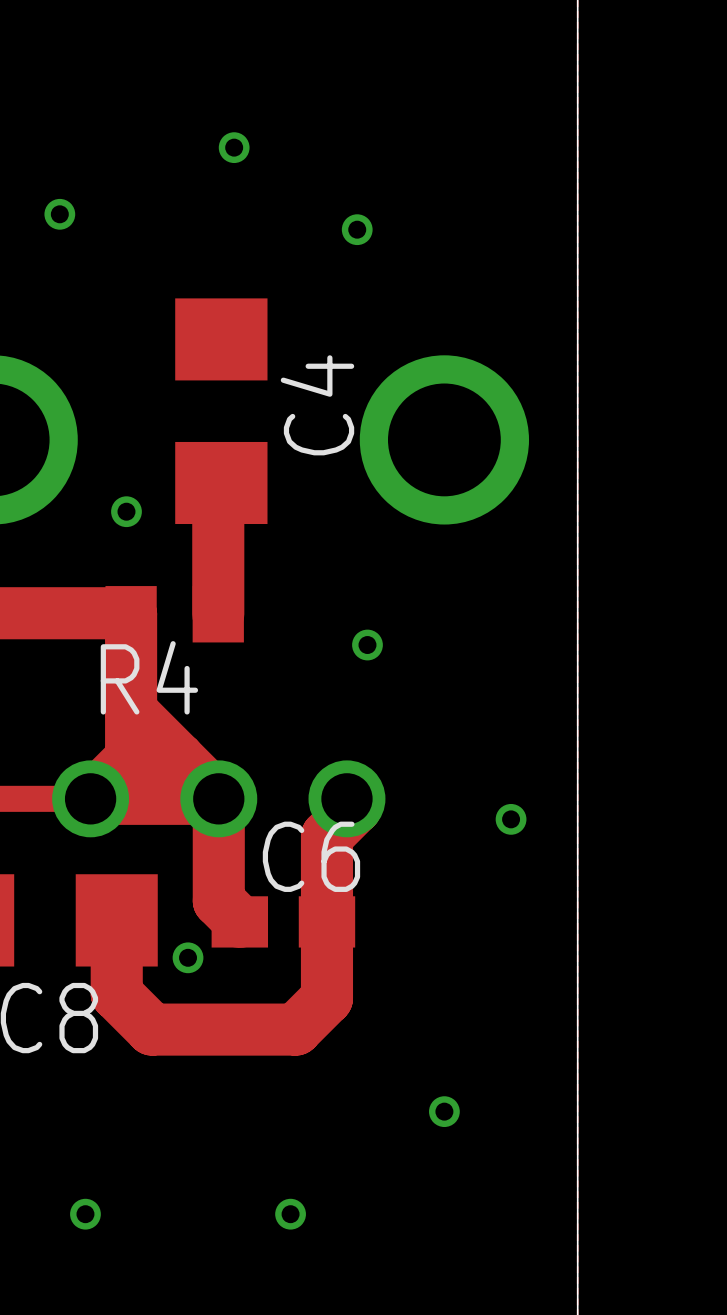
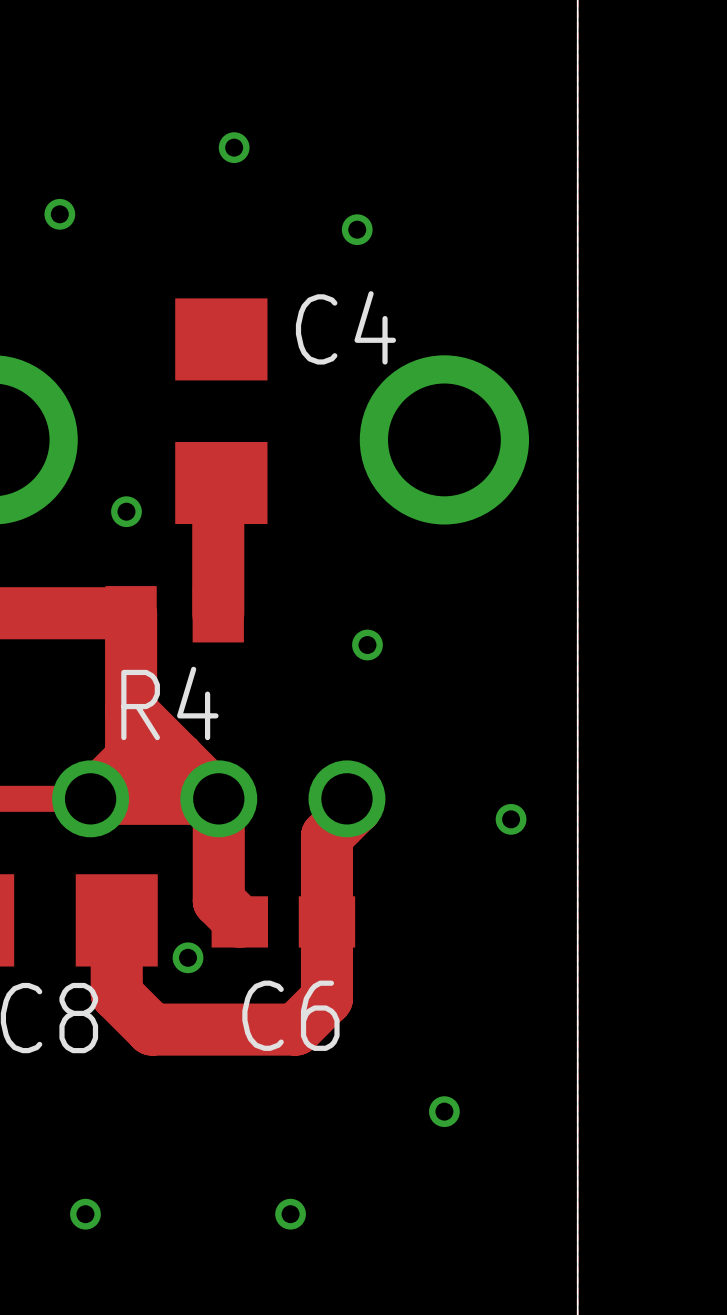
C4 name rotation: 0° (317, 405) -> 90° clockwise (345, 327)
R4 name position: R4 (149, 677) -> R4 (169, 703)
C6 name position: C6 (311, 856) -> C6 (290, 1015)

